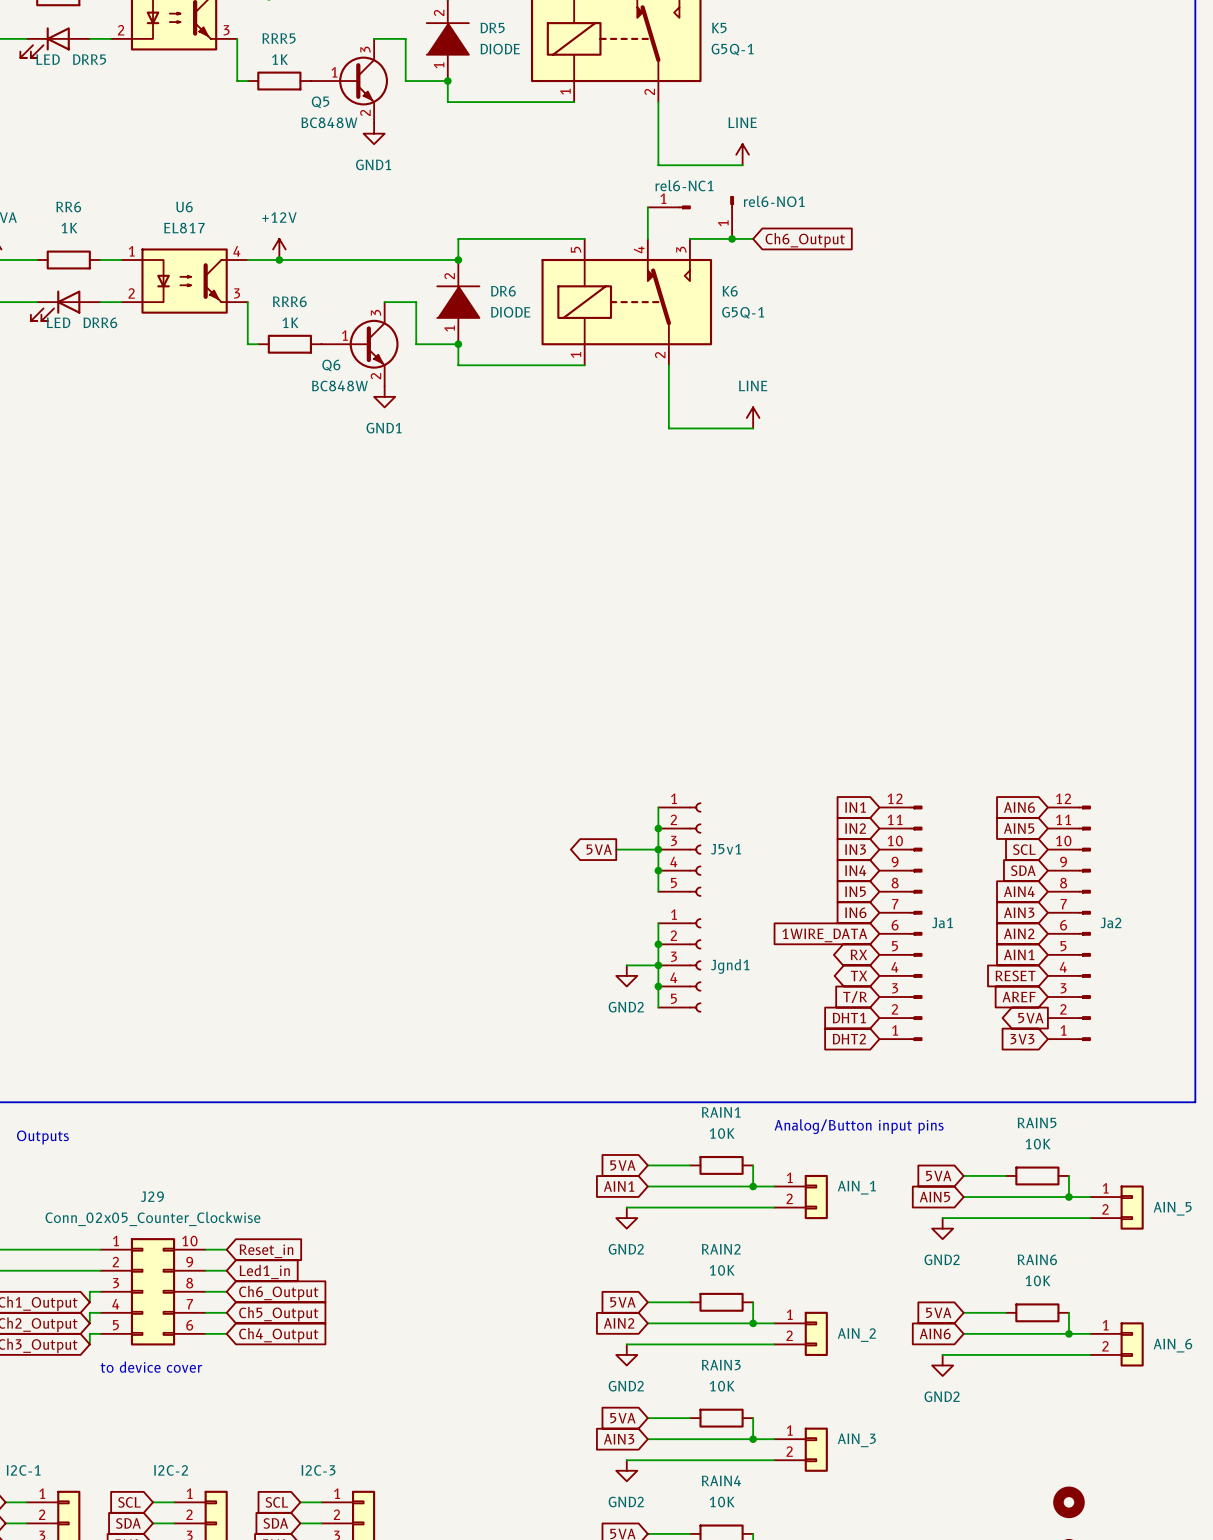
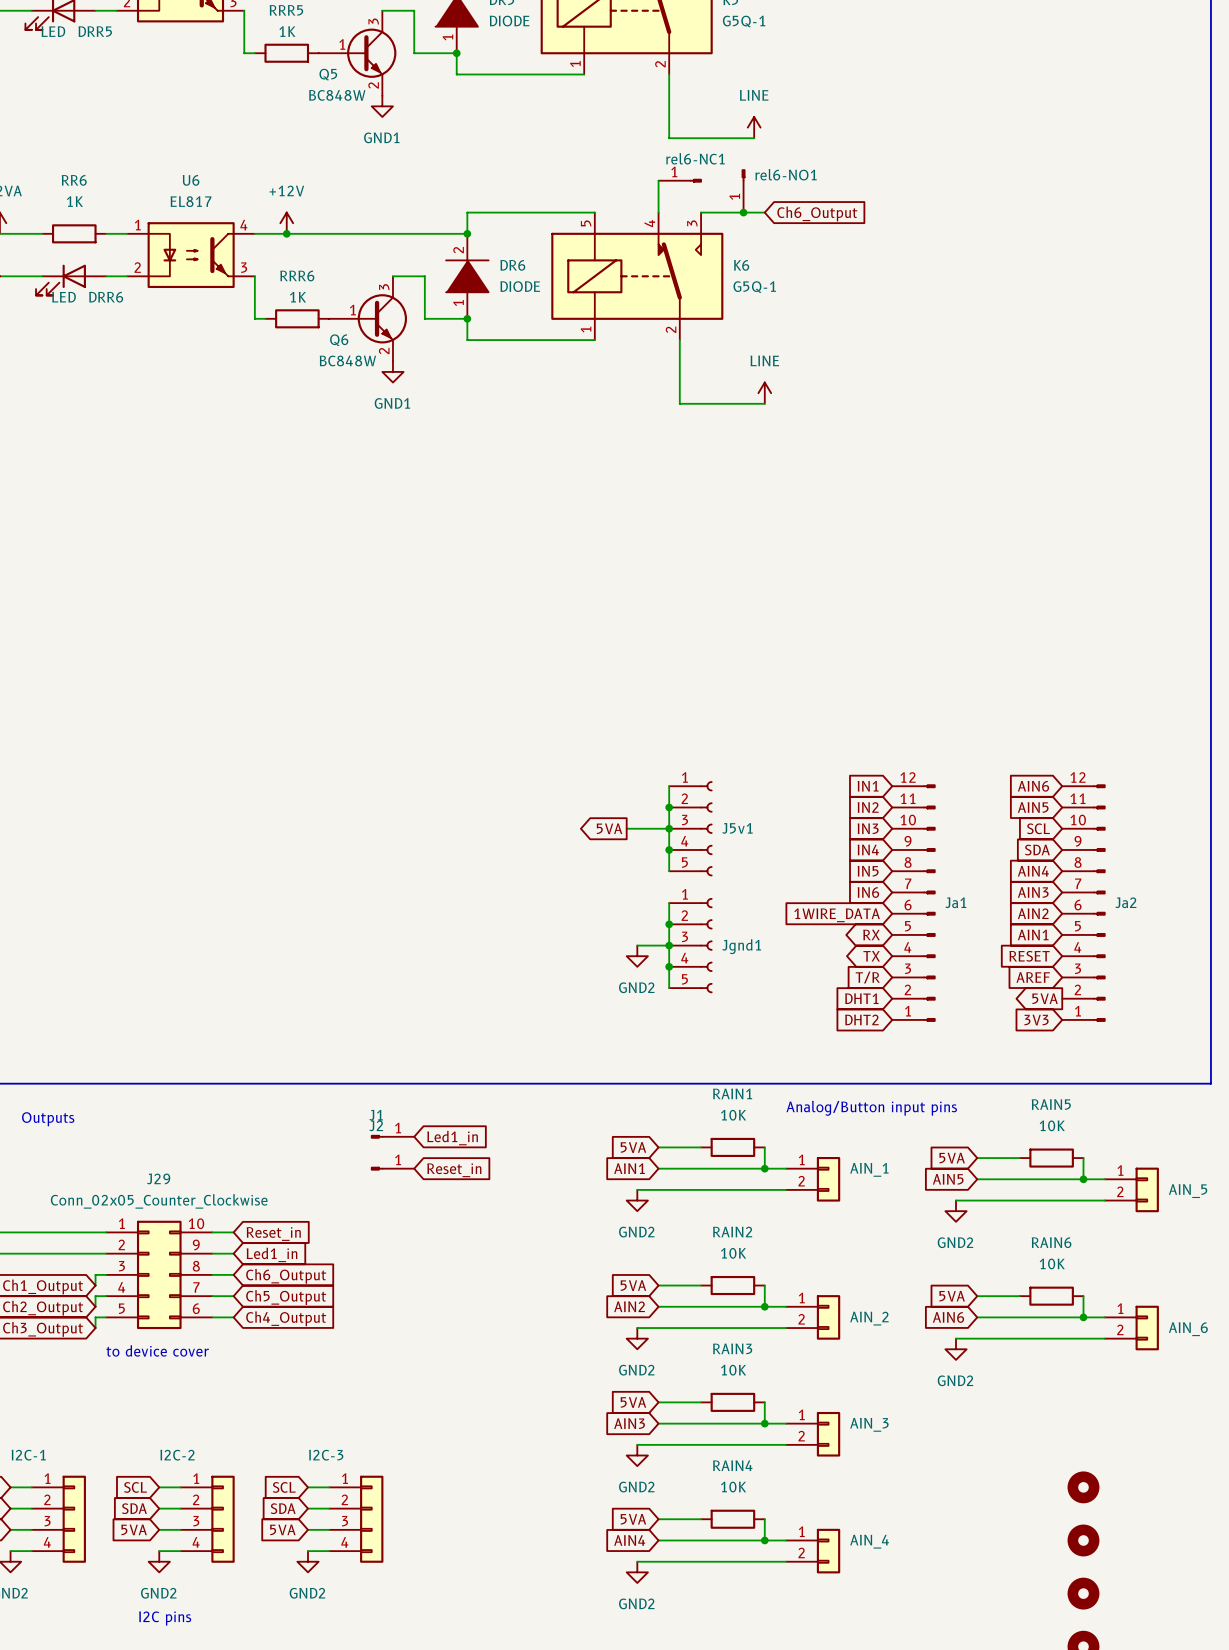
J1: none -> (392, 1136)
global label: none -> Led1_in (452, 1138)
J2: none -> (392, 1168)
global label: none -> Reset_in (454, 1170)

